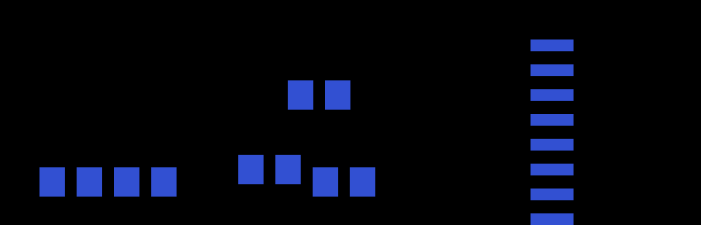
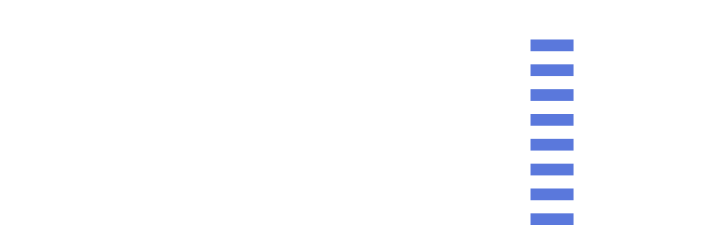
part: (319, 95) -> none
part: (269, 169) -> none
part: (70, 181) -> none
part: (145, 181) -> none
part: (343, 181) -> none

